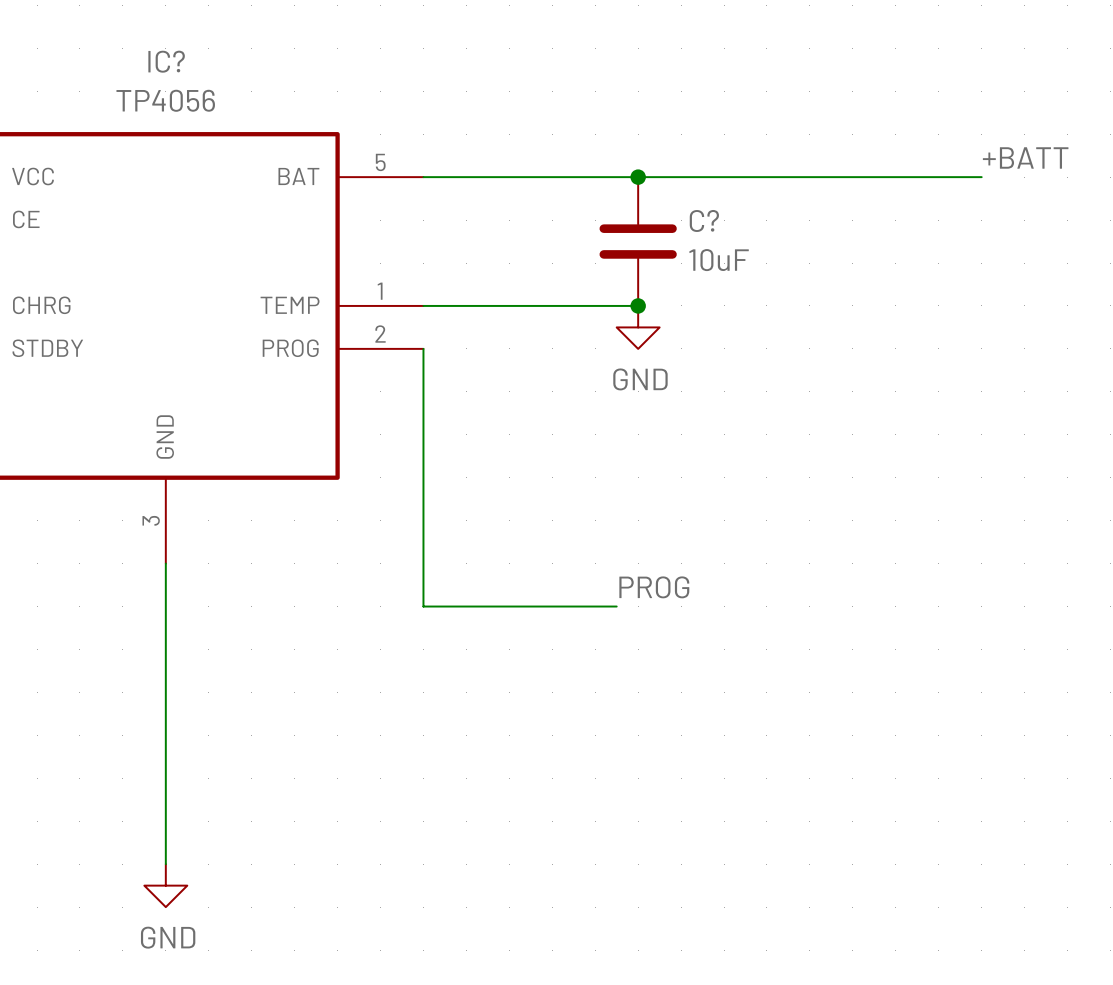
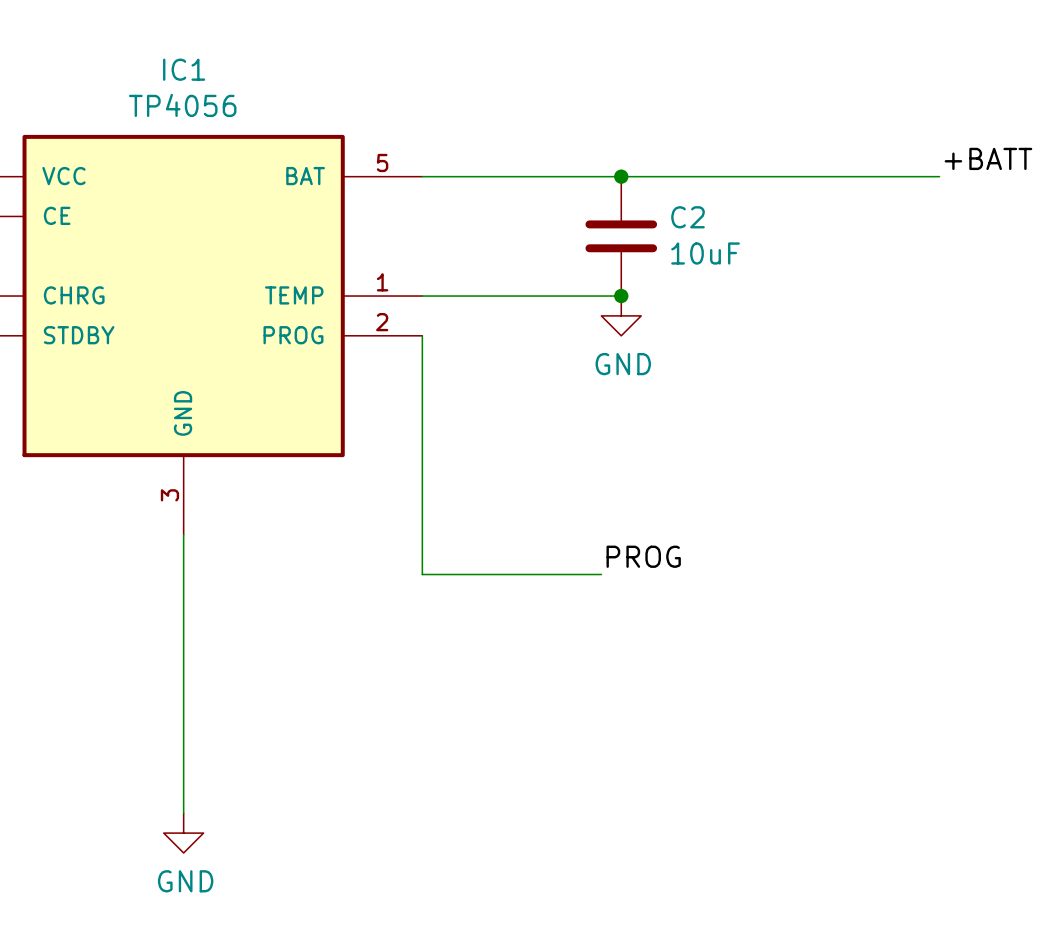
IC? name: IC? (166, 61) -> IC1 (184, 69)
C? name: C? (704, 220) -> C2 (688, 217)

